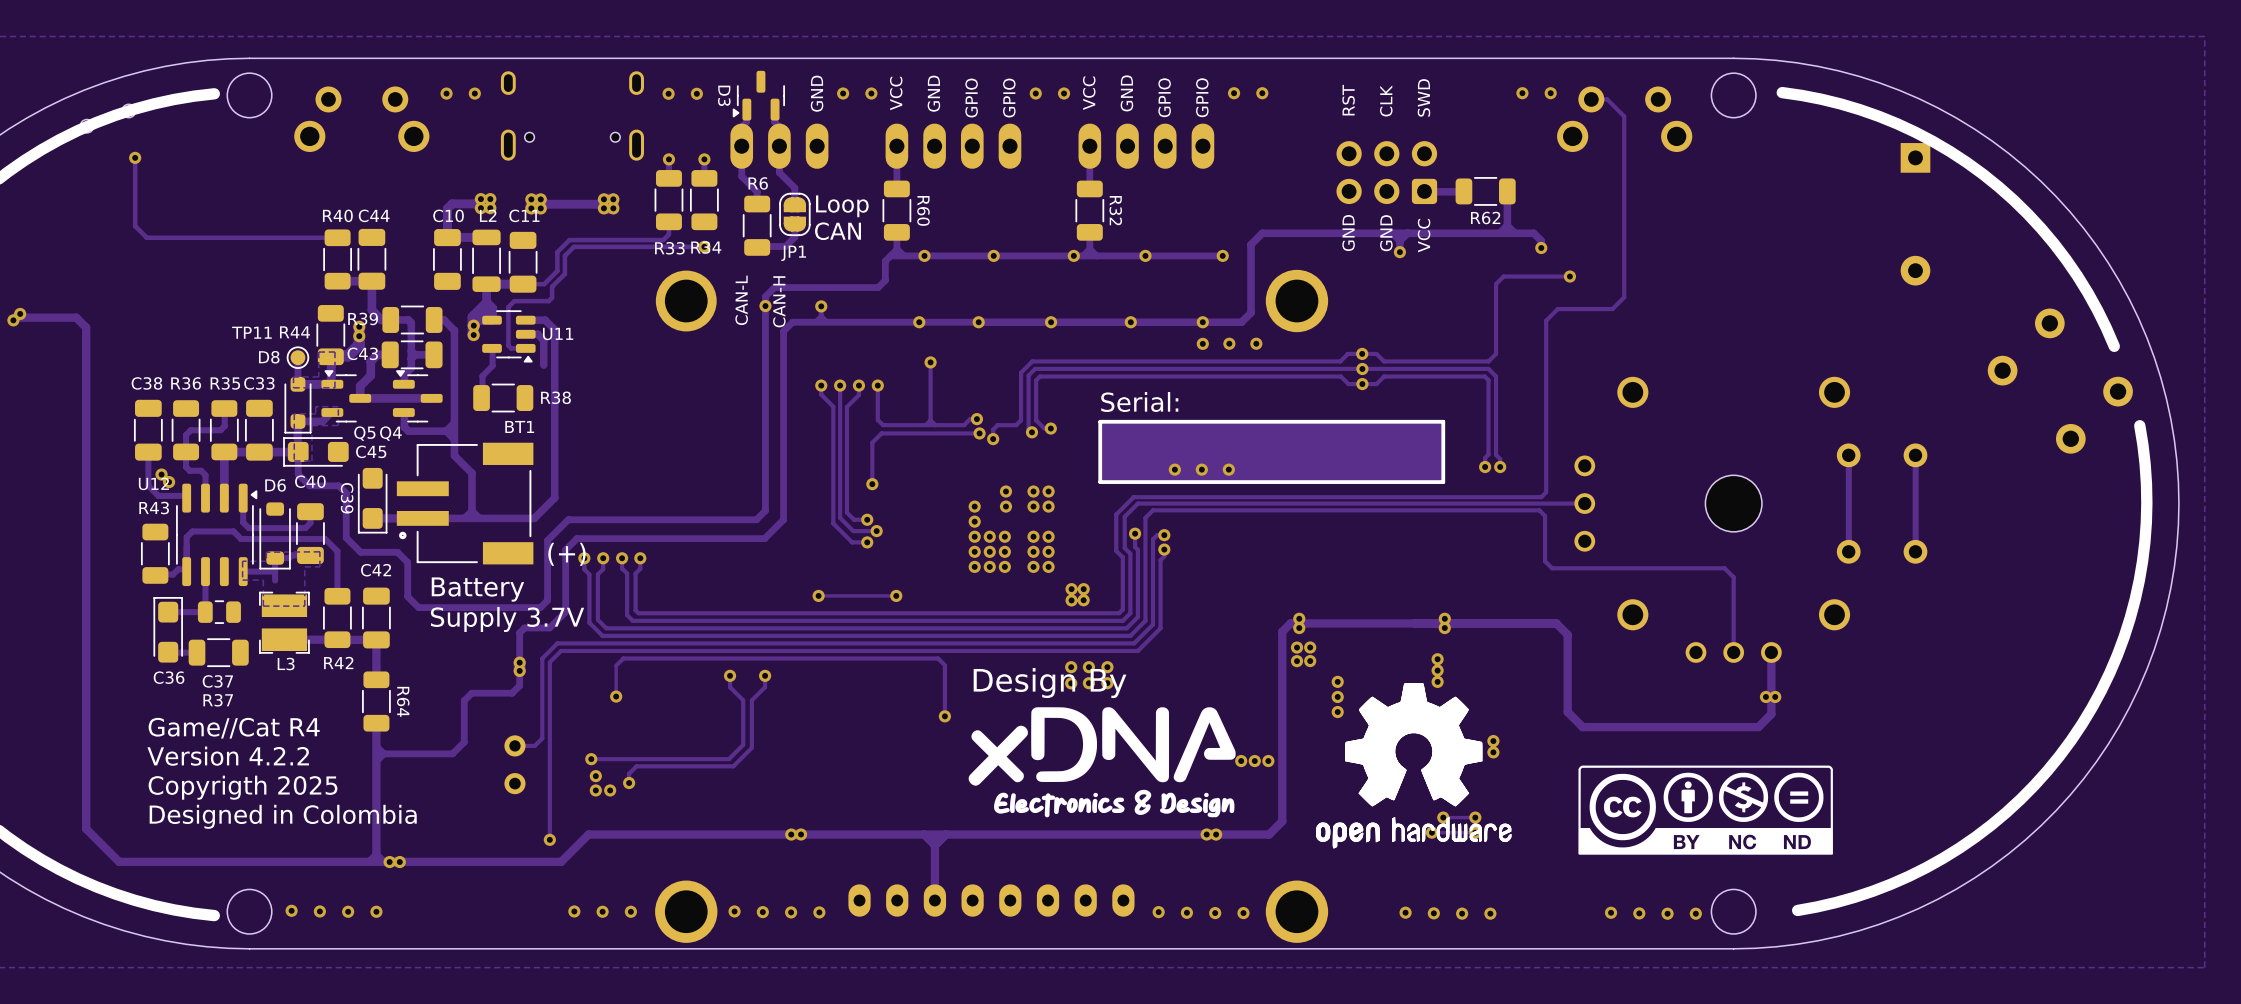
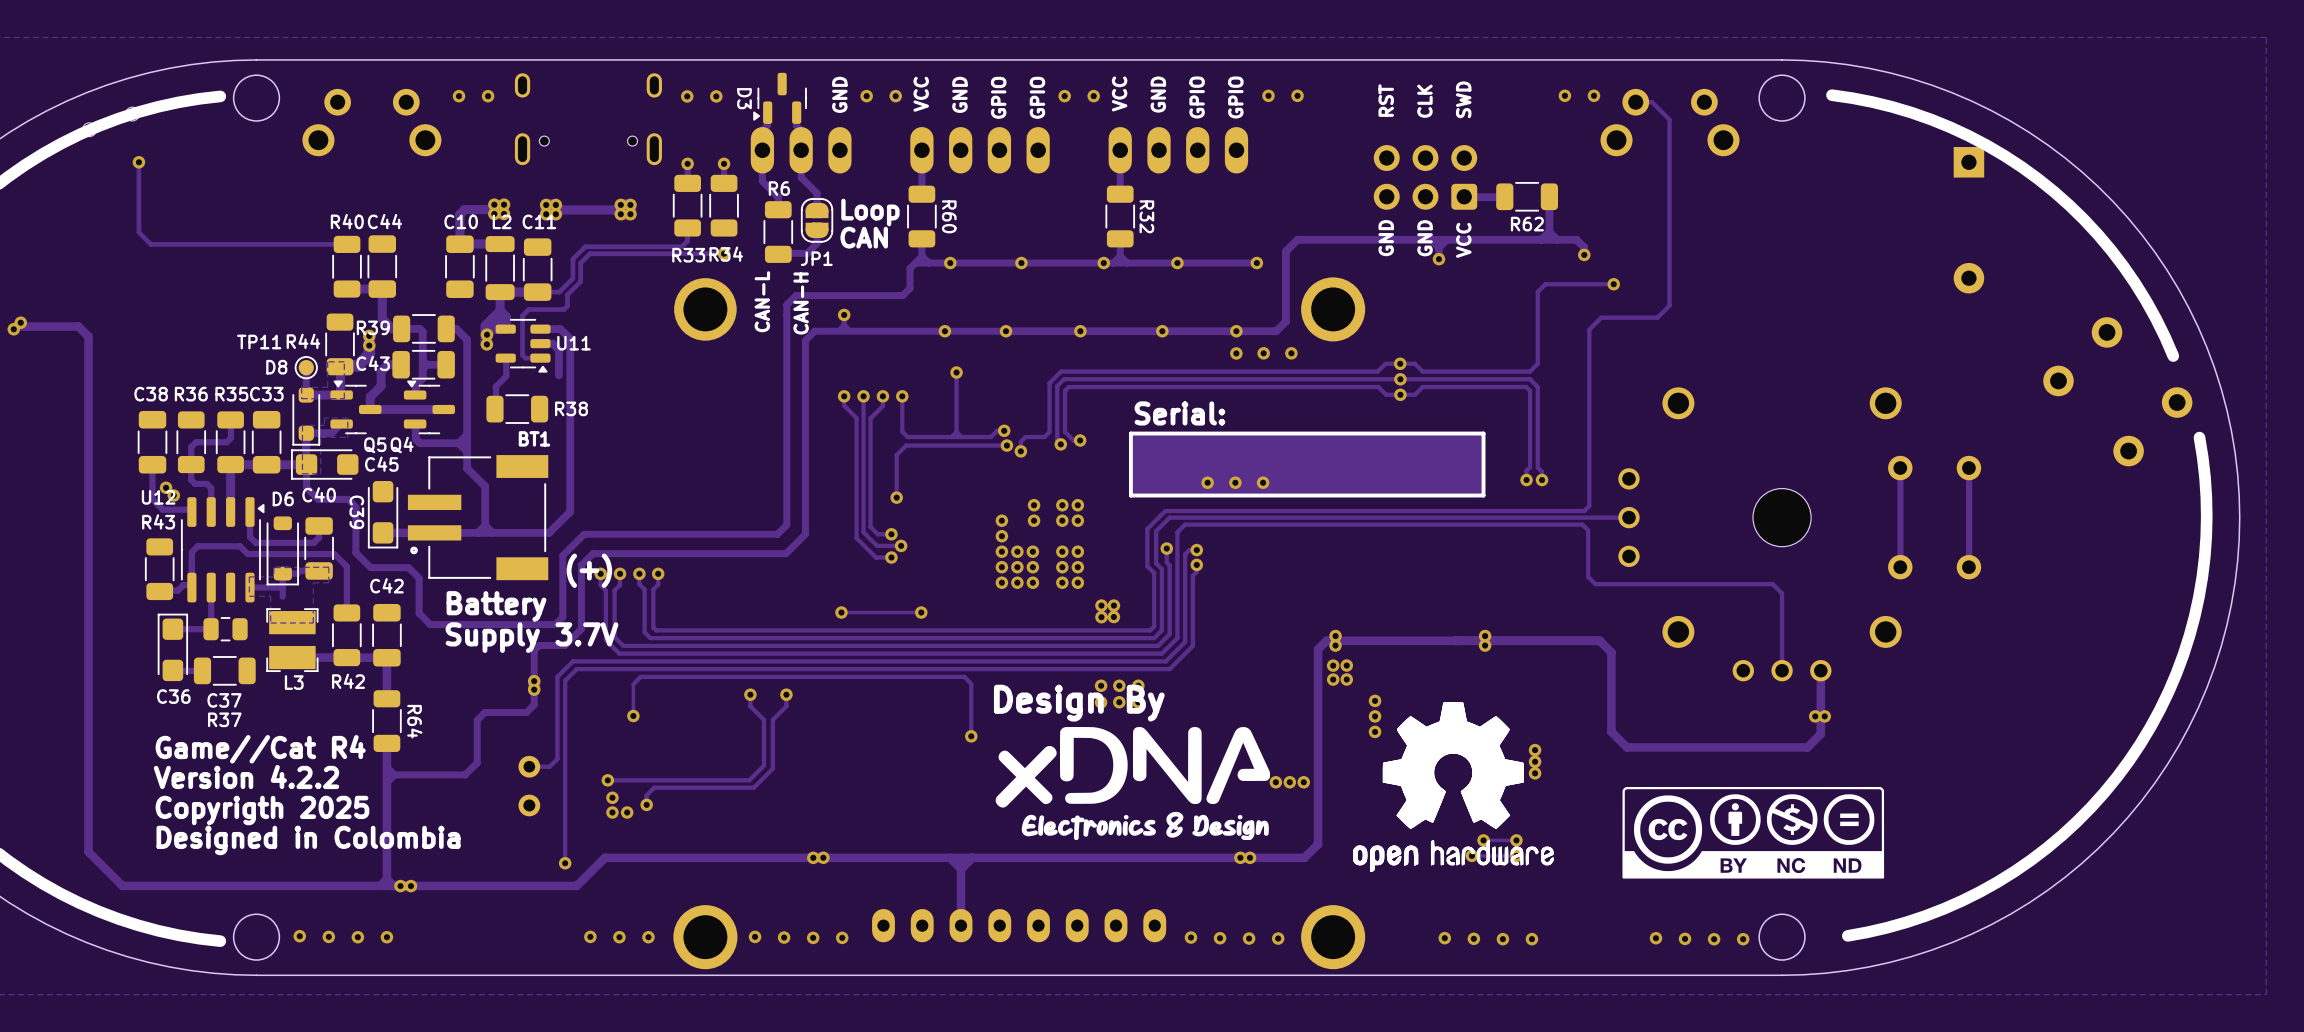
via: (765, 306) -> none
via: (1437, 659) -> none
via: (1437, 670) -> none
via: (1437, 681) -> none
via: none -> (1535, 750)

